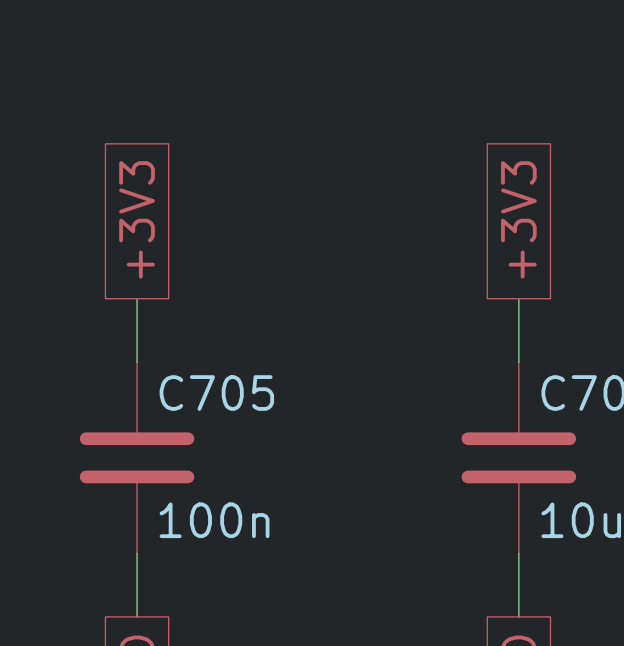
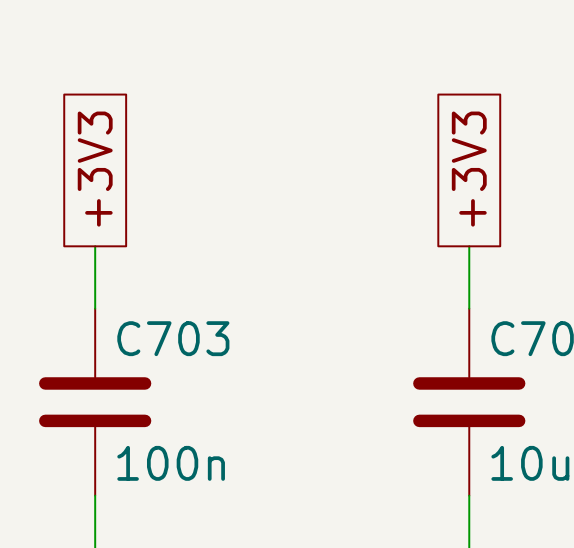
C705 name: C705 (216, 393) -> C703 (173, 338)

